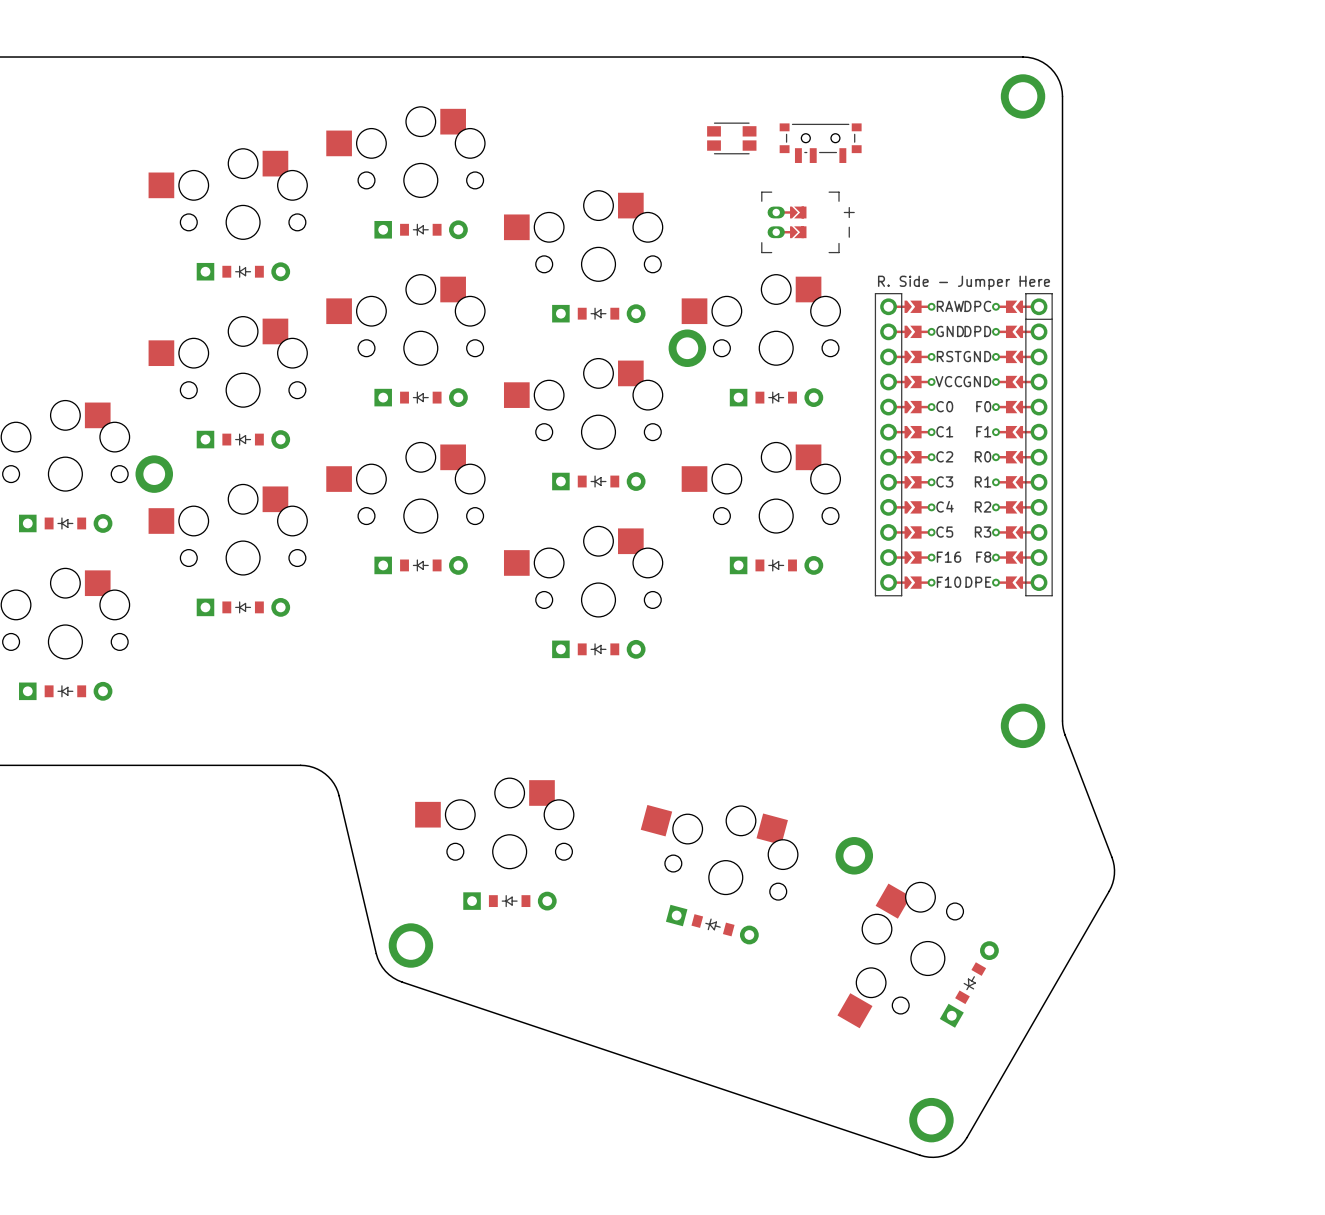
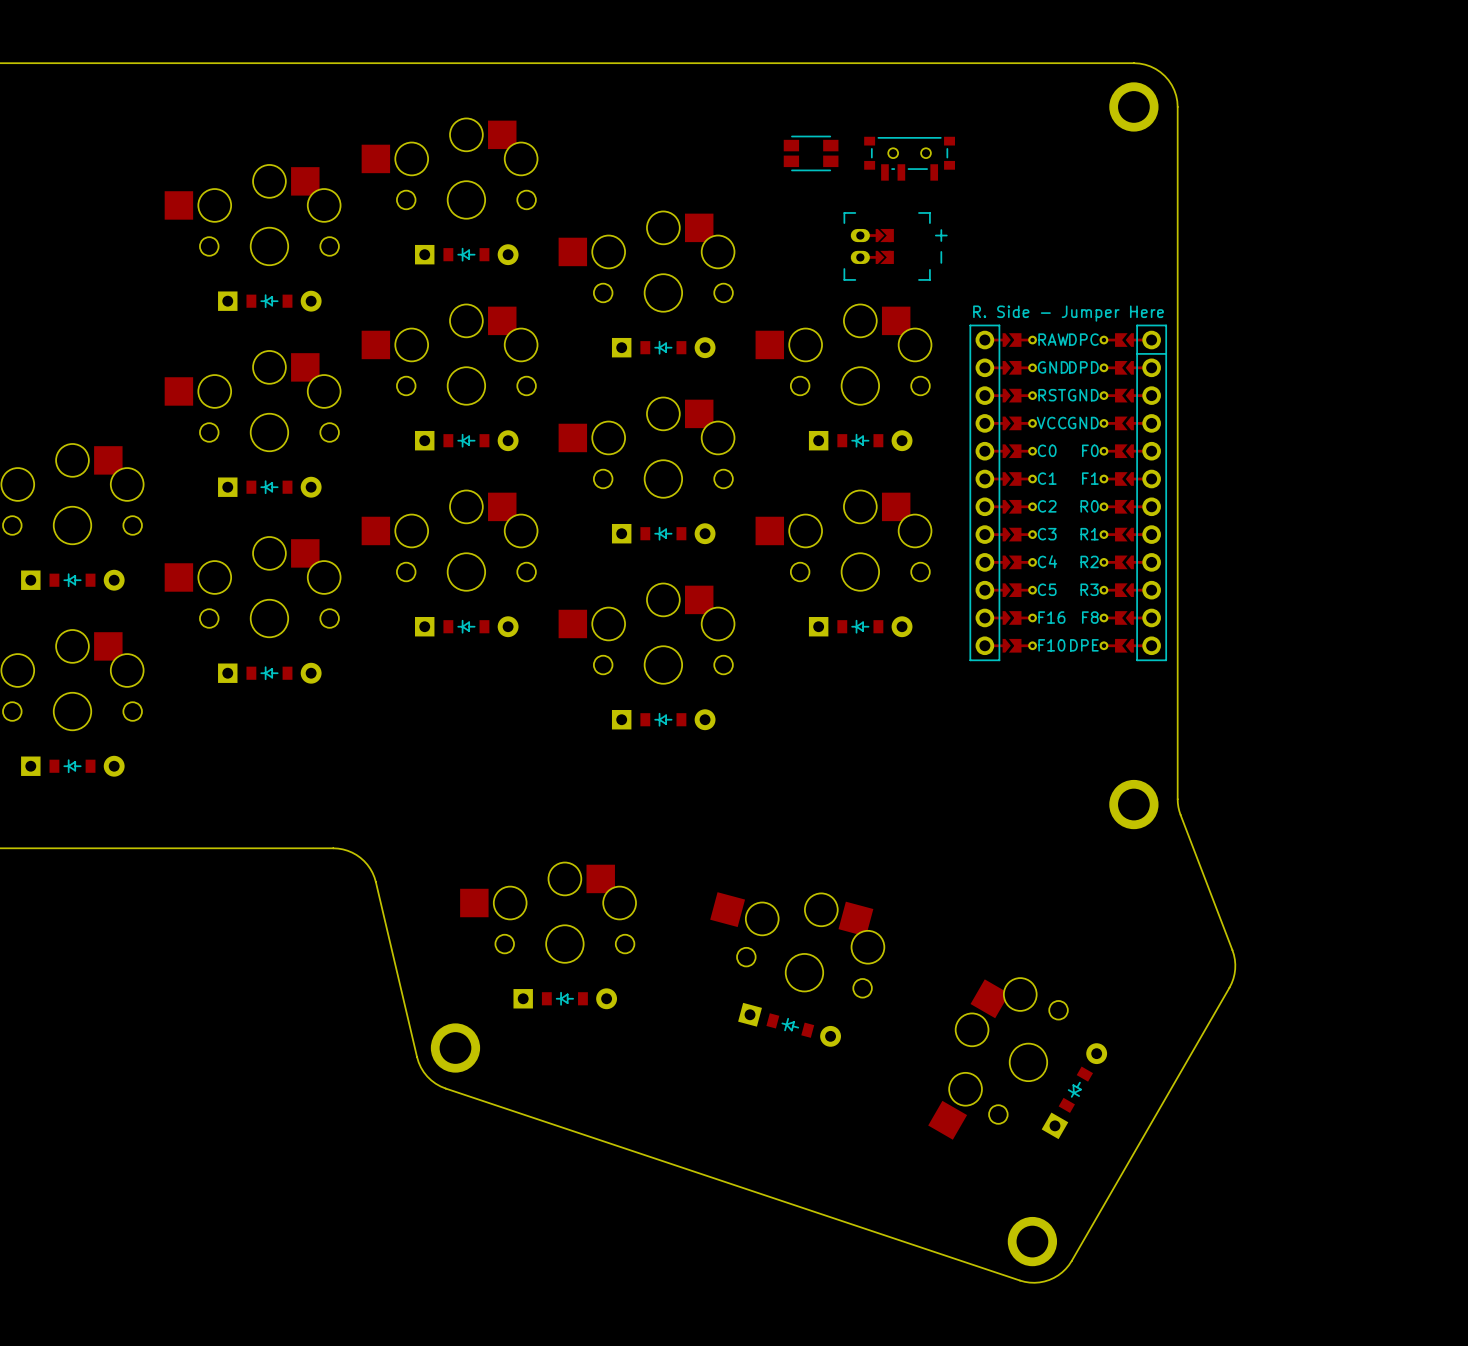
part: (687, 348) -> none
part: (154, 474) -> none
part: (854, 855) -> none

